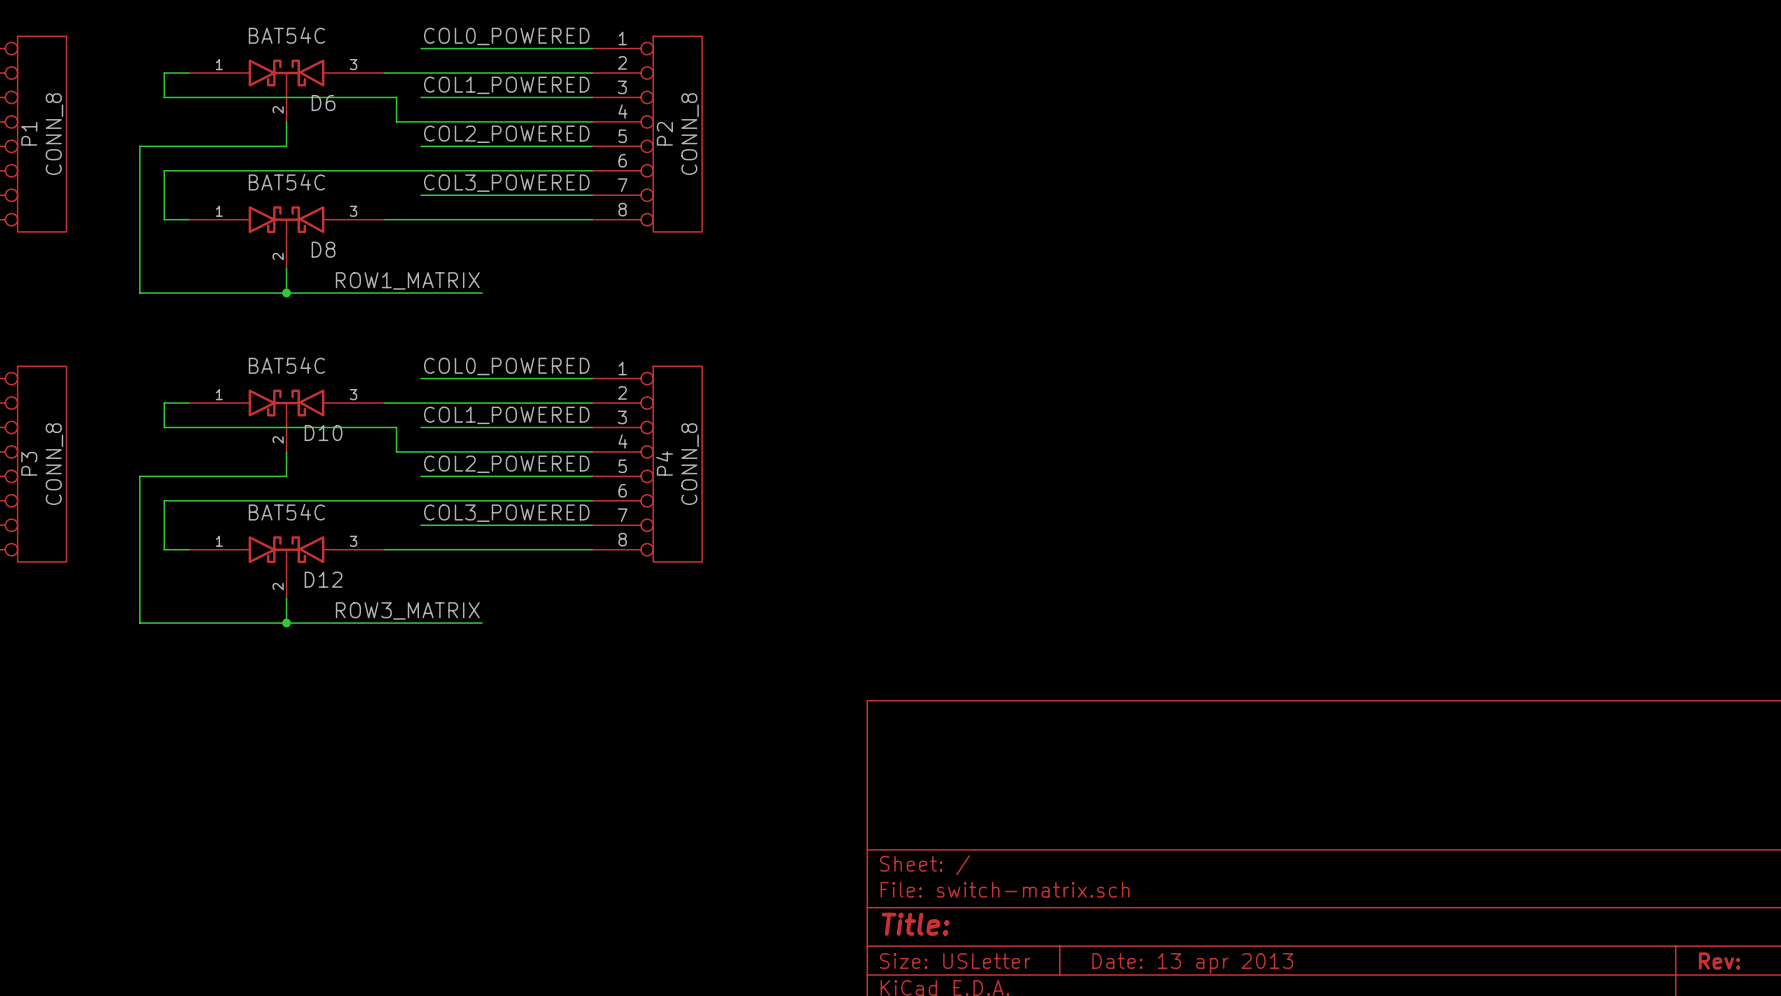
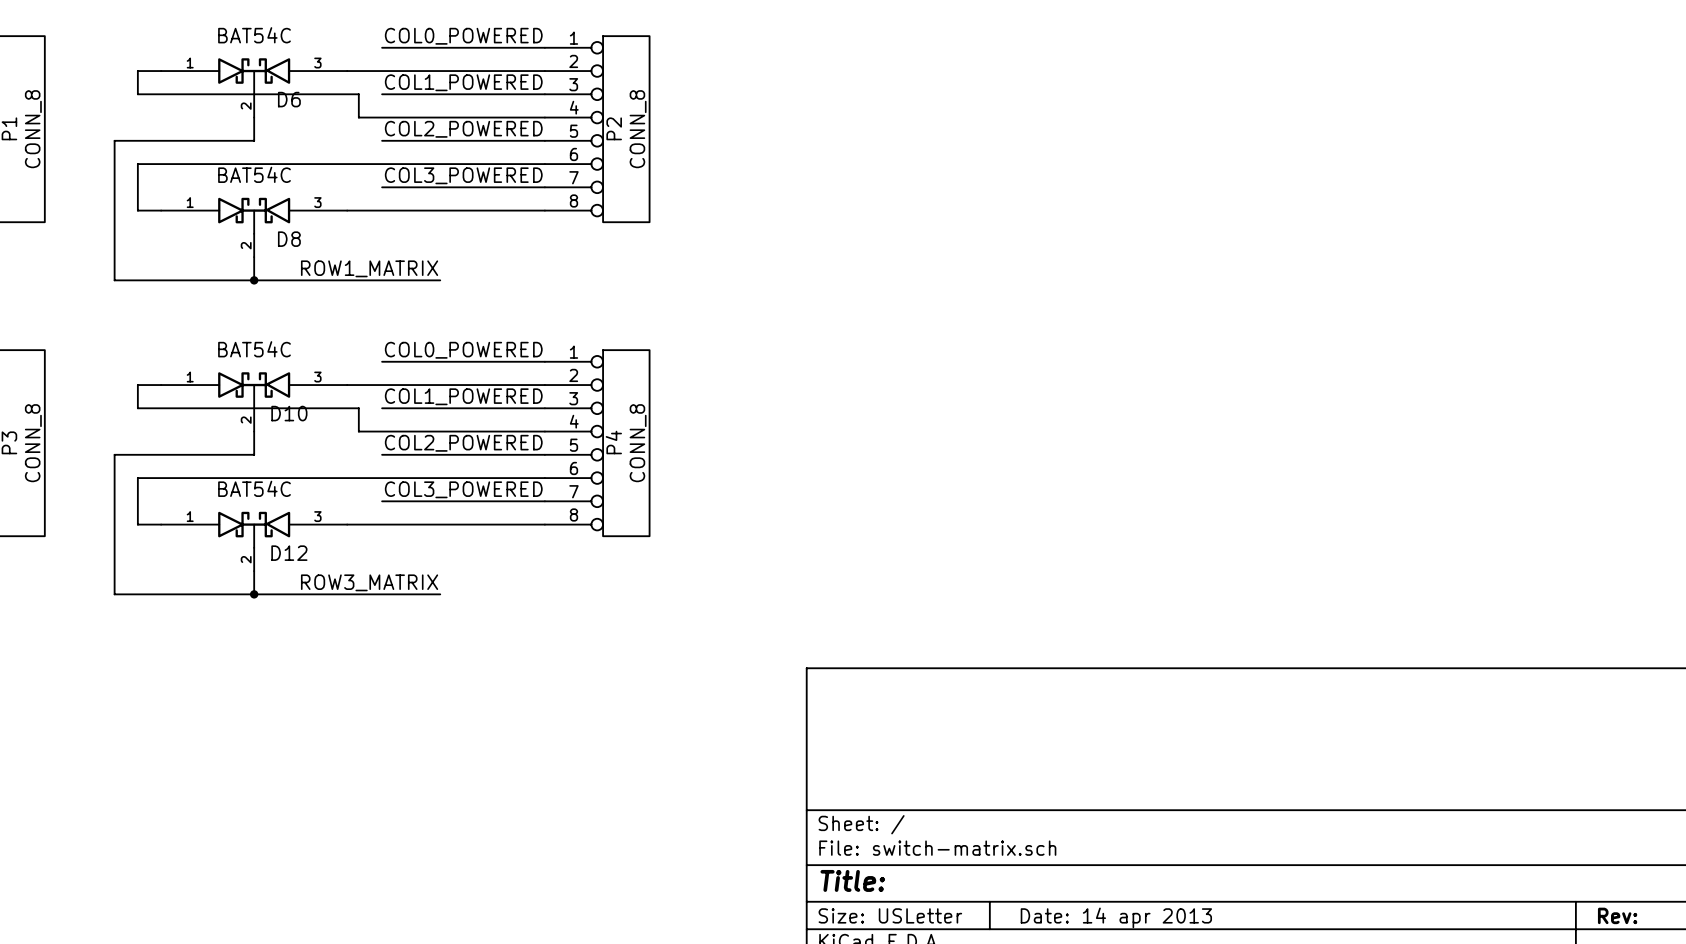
title block: Date: 13 apr 2013 (1192, 963) -> Date: 14 apr 2013 (1116, 917)

